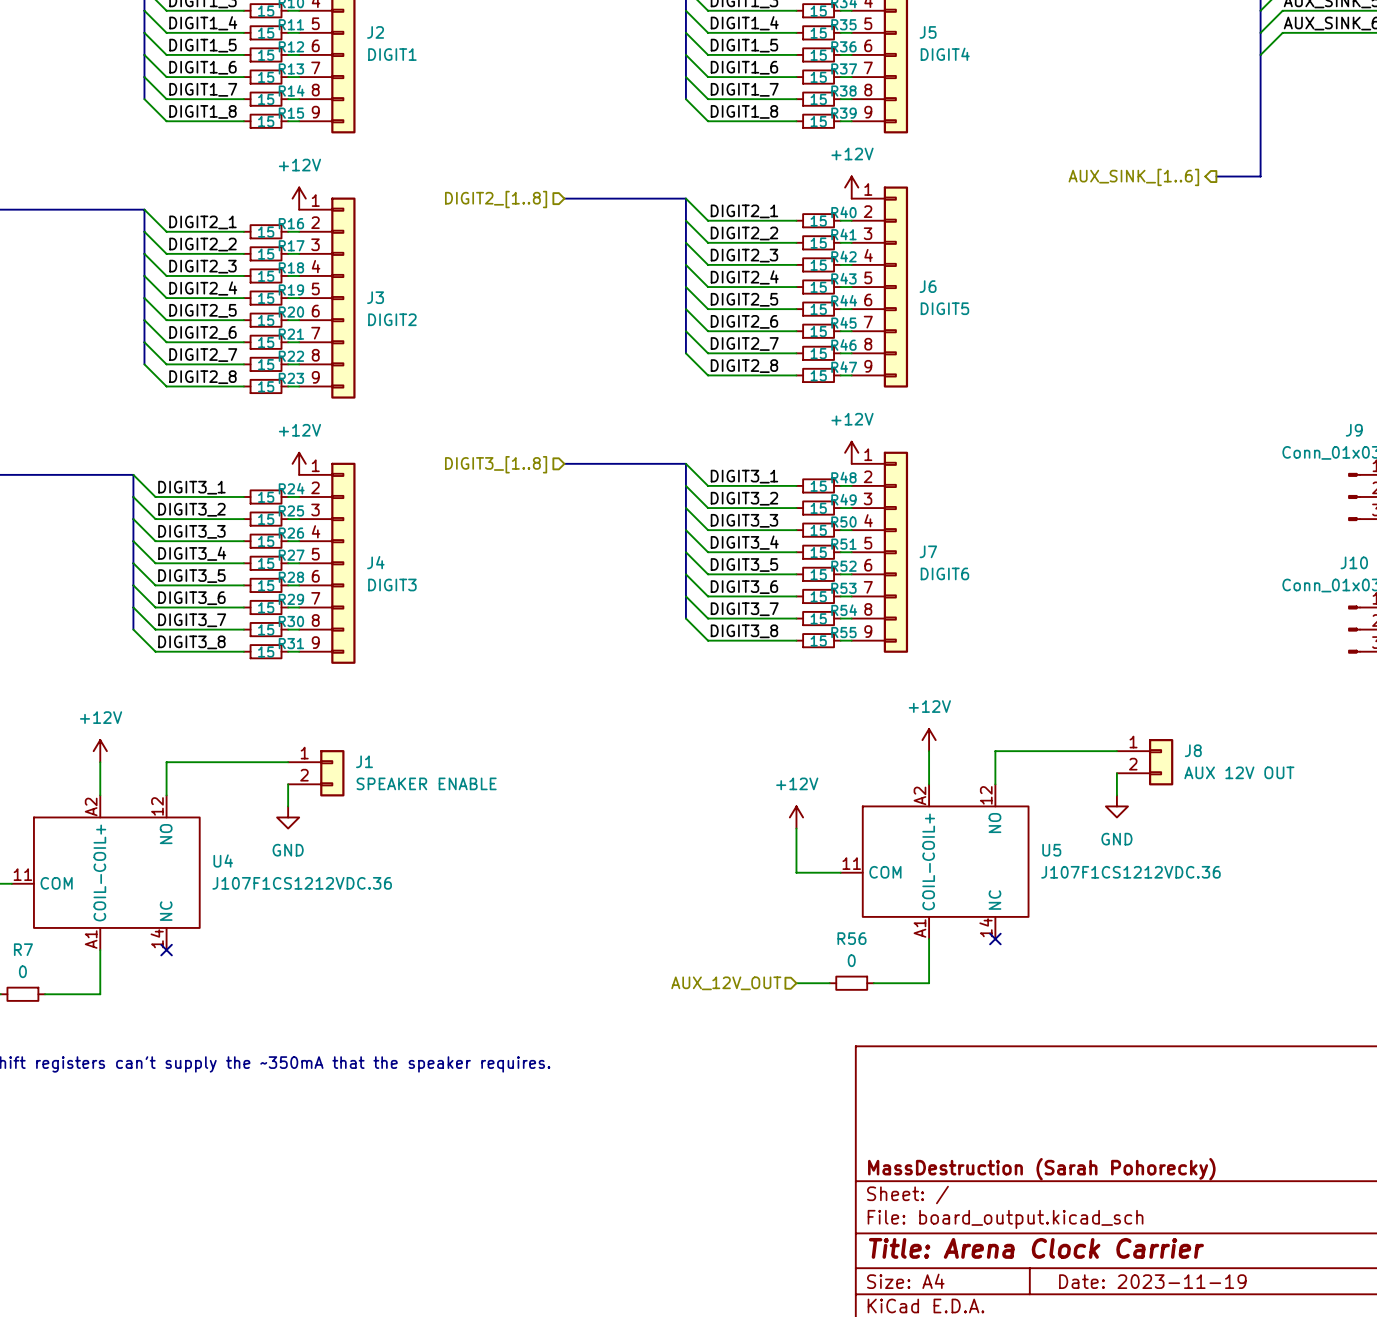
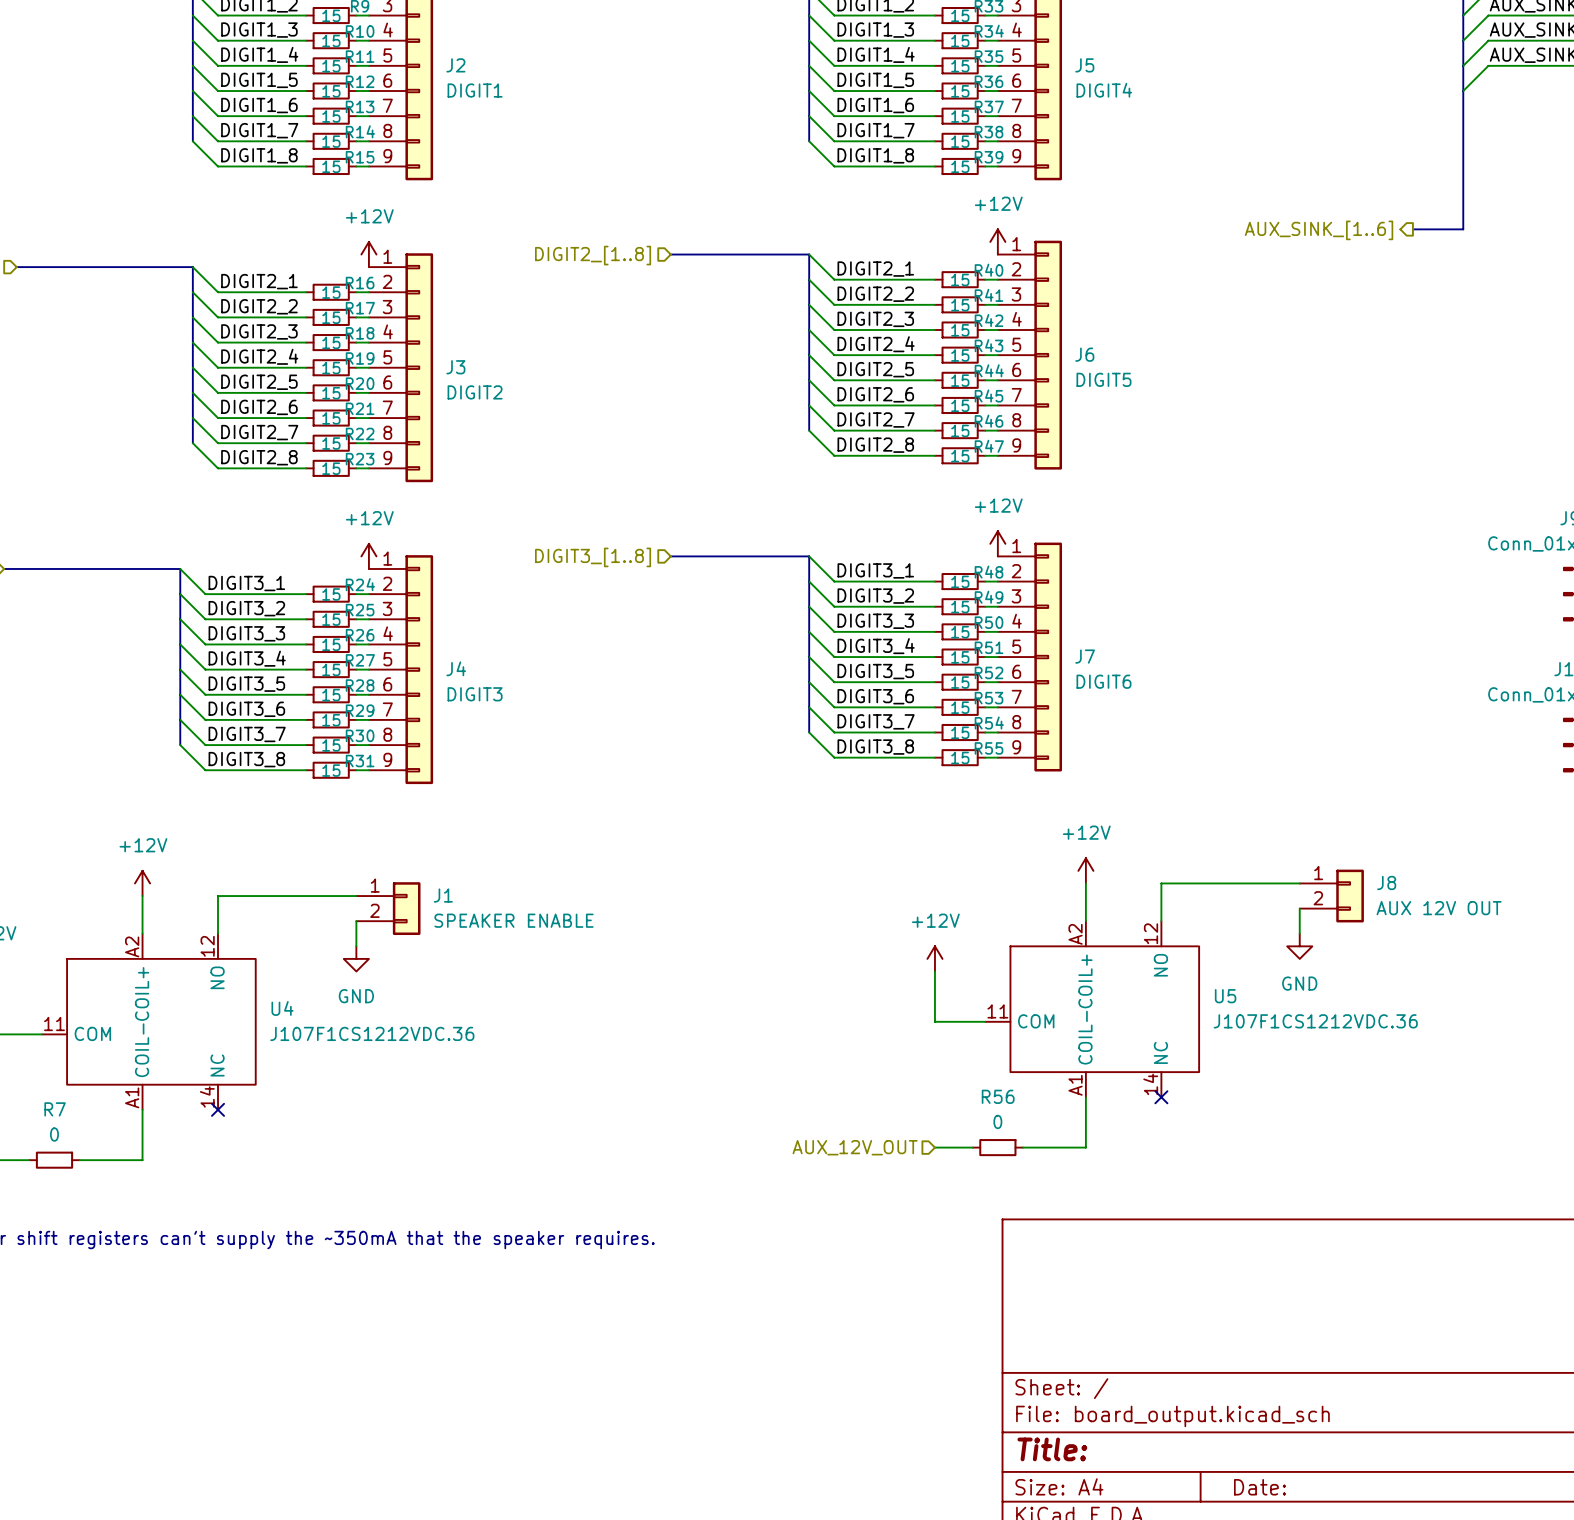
title block: MassDestruction (Sarah Pohorecky) (1041, 1169) -> none
title block: Title: Arena Clock Carrier (1036, 1248) -> Title: (1052, 1449)
title block: Date: 2023-11-19 (1152, 1281) -> Date: (1259, 1487)

